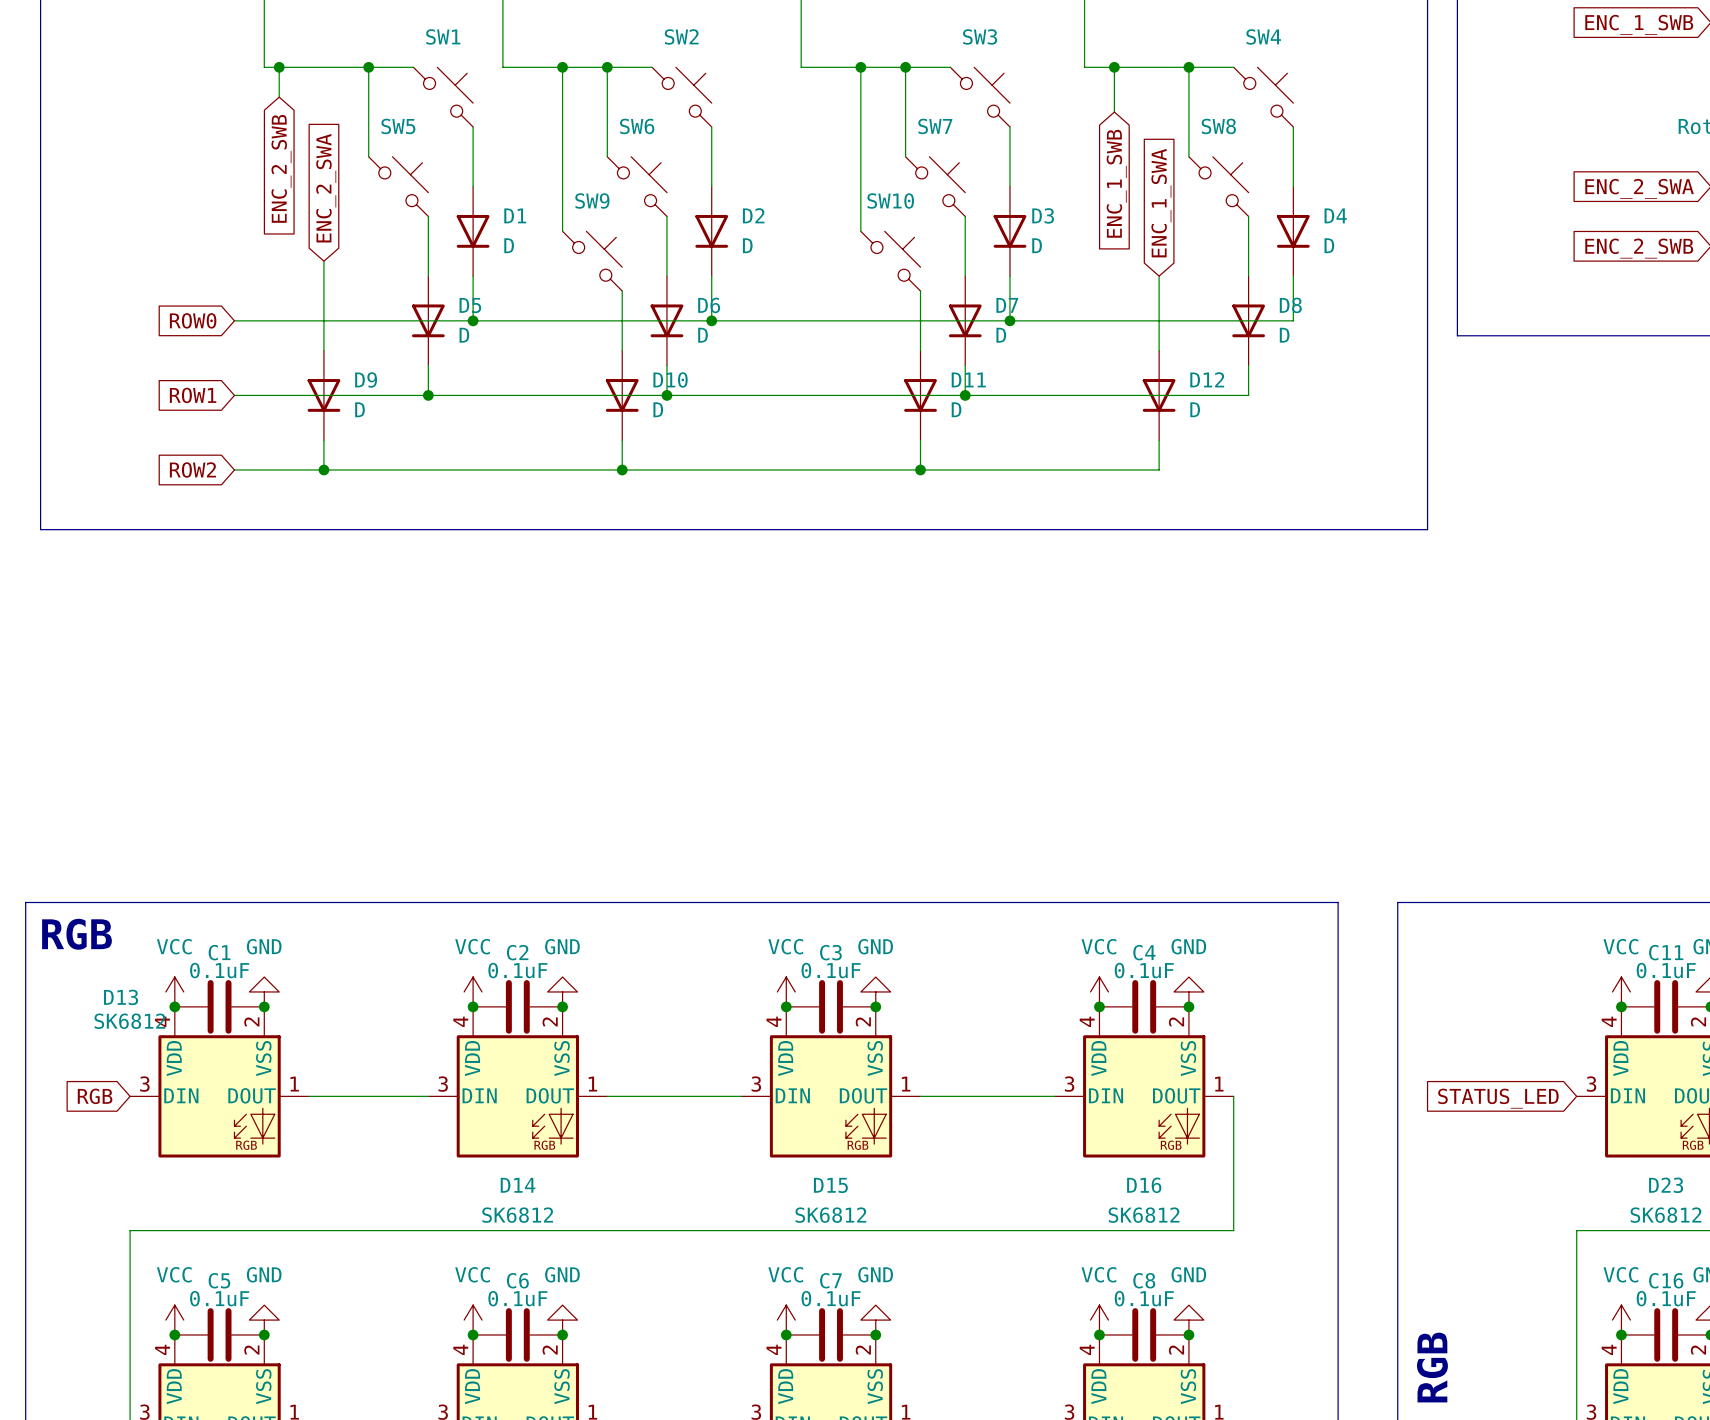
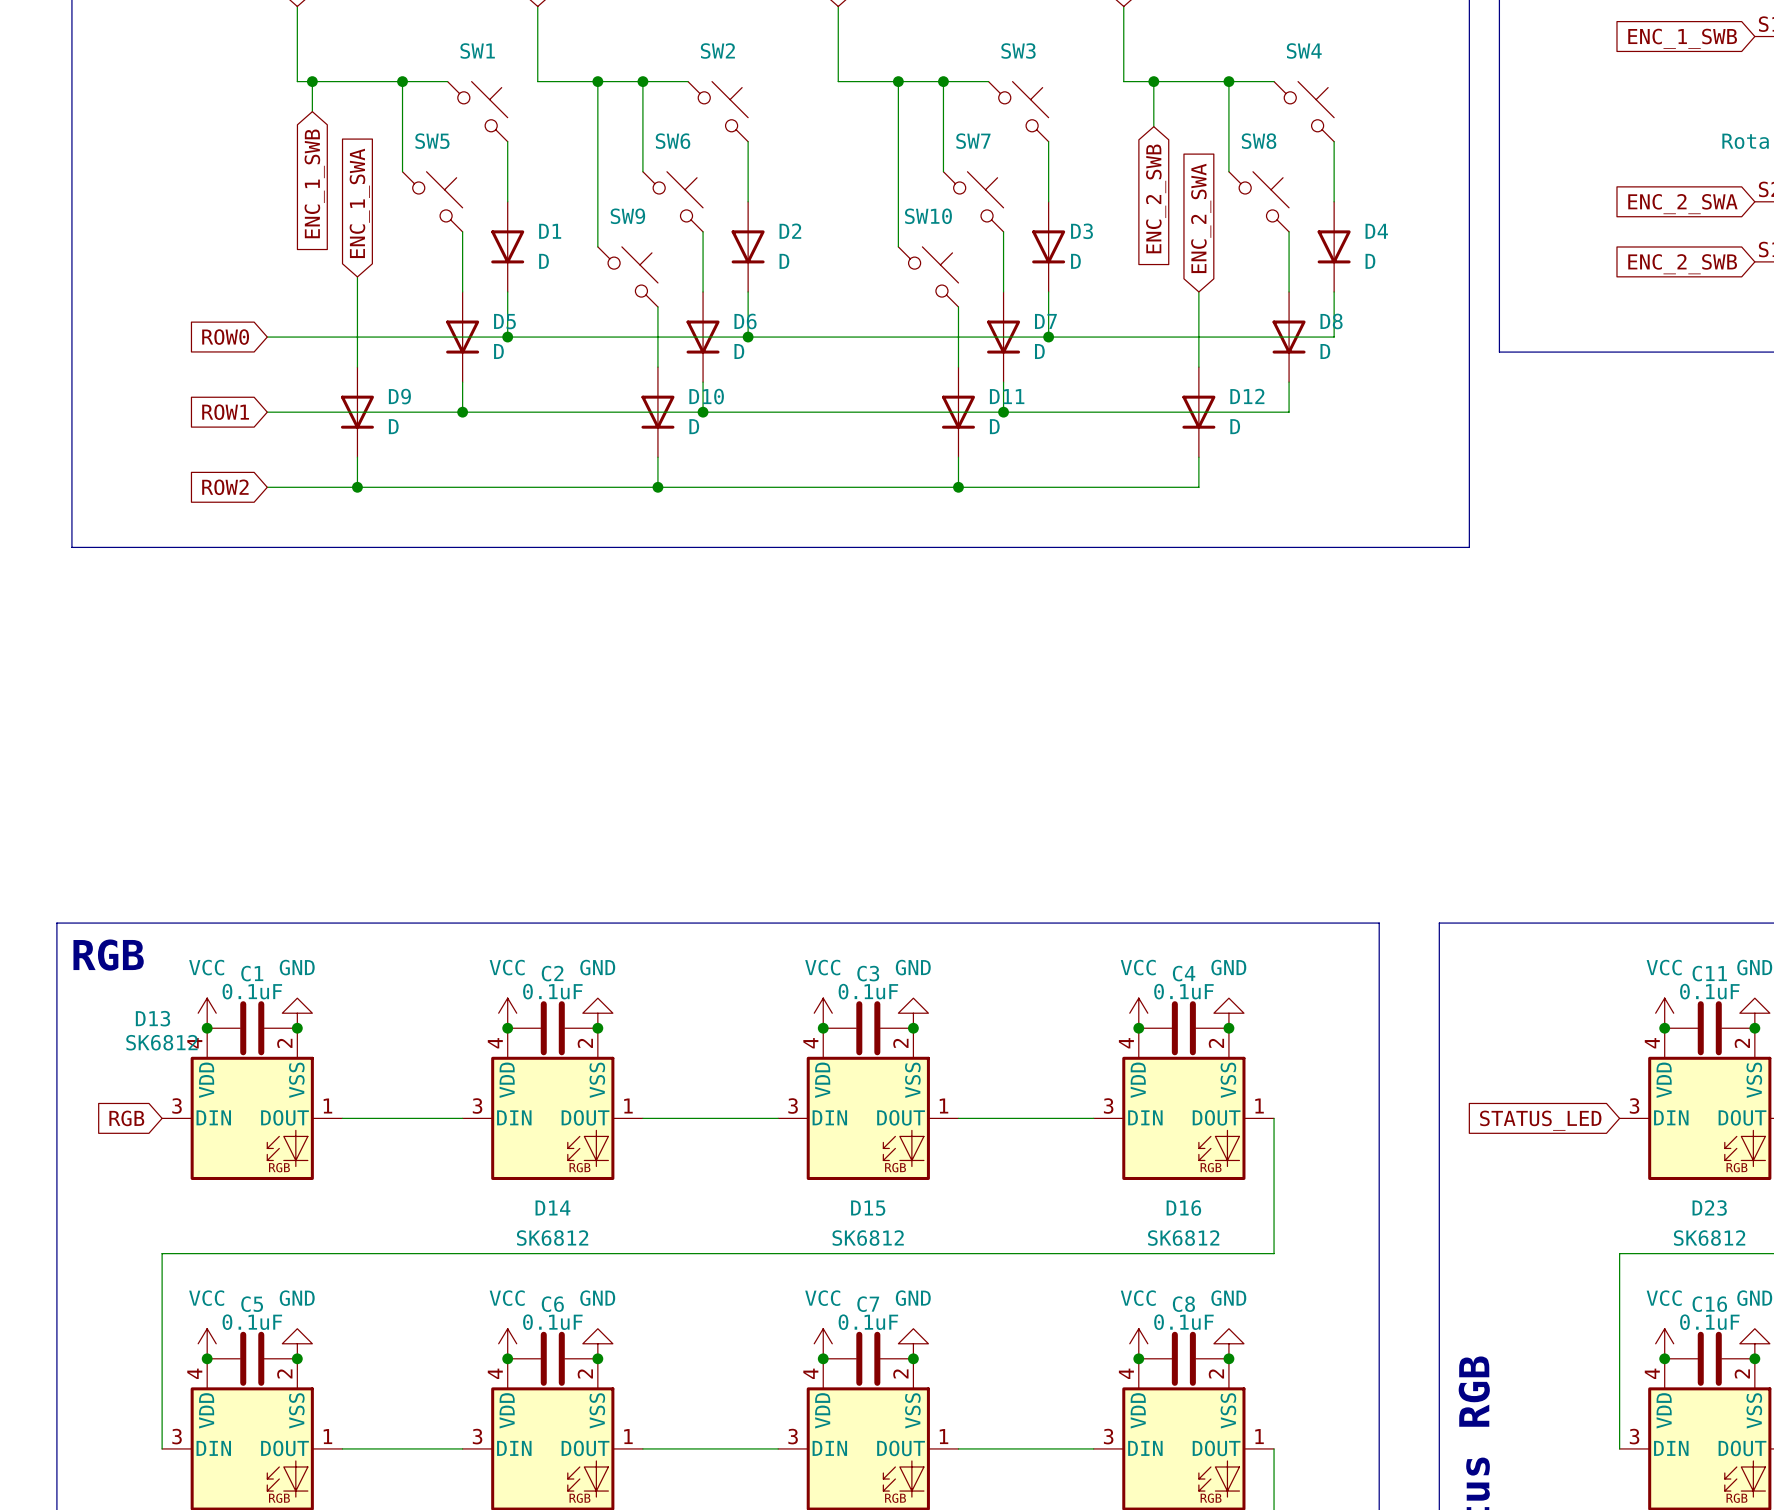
global label: ENC_2_SWB (281, 168) -> ENC_1_SWB (314, 183)
global label: ENC_1_SWB (1116, 183) -> ENC_2_SWB (1156, 198)
global label: ENC_2_SWA (326, 188) -> ENC_1_SWA (359, 203)
global label: ENC_1_SWA (1161, 203) -> ENC_2_SWA (1201, 218)

